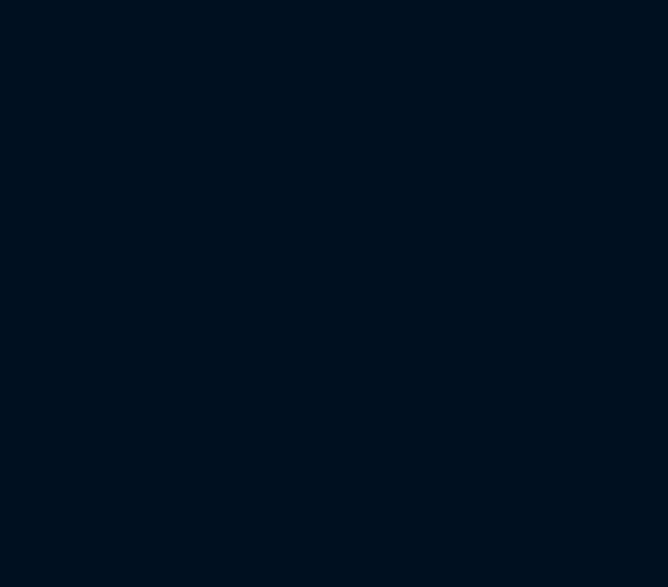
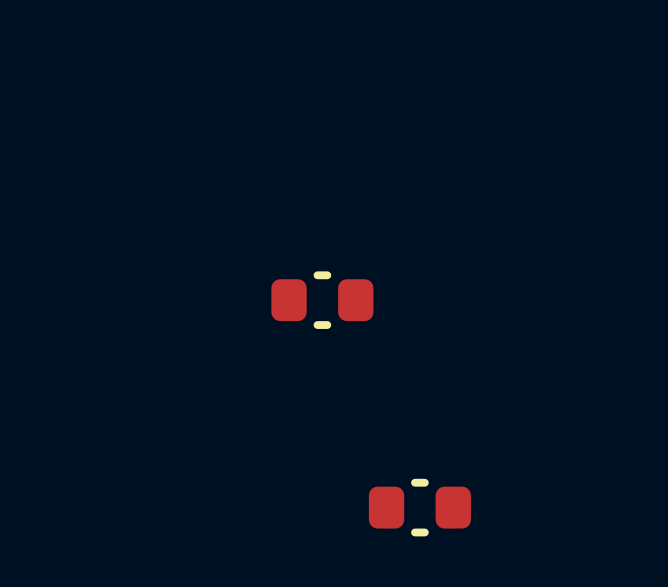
part: none -> (322, 300)
part: none -> (419, 507)

